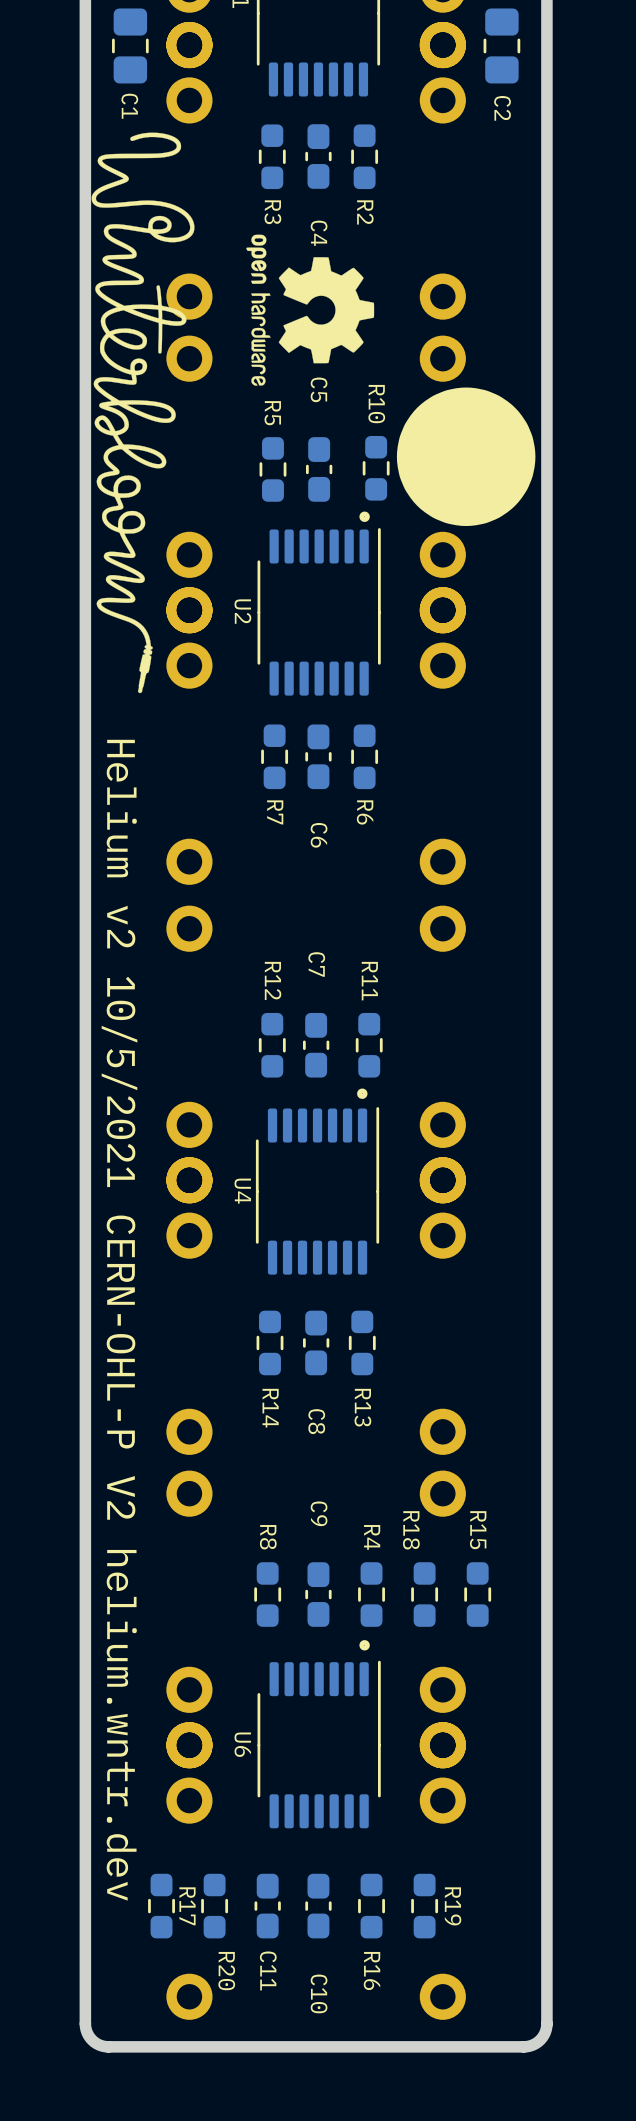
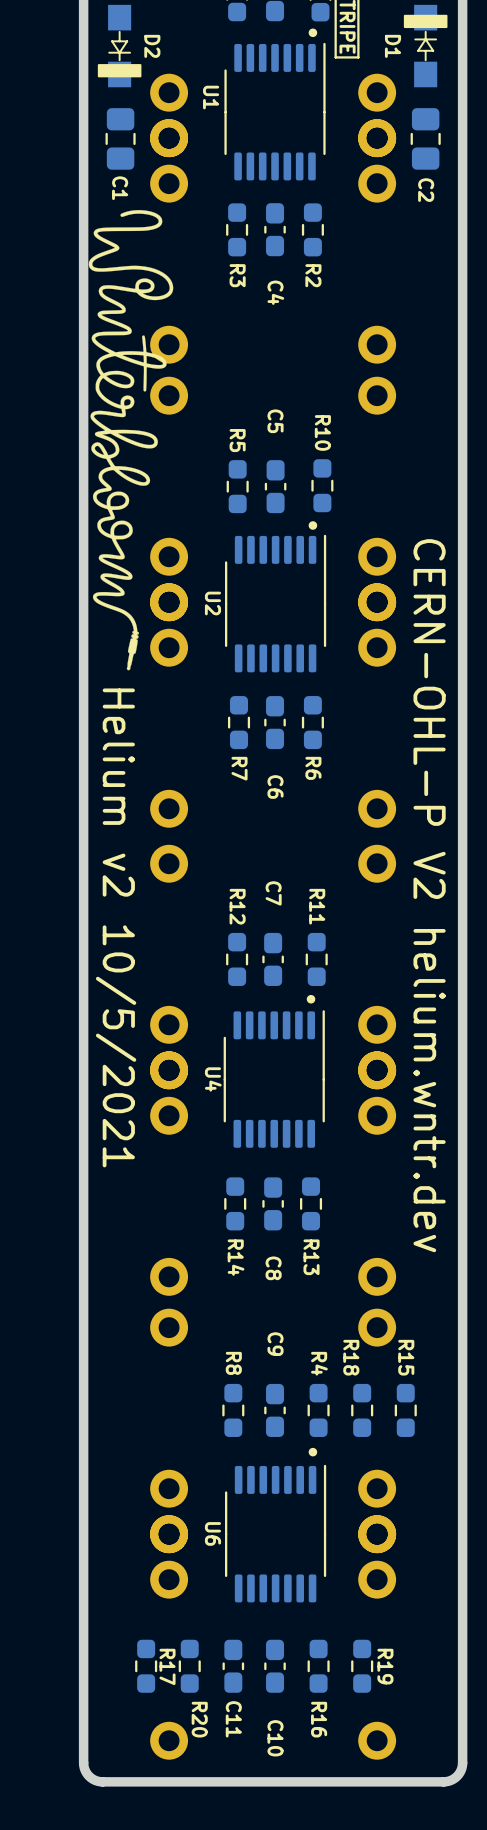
drawing: [246, 234, 536, 527] -> none
text: none -> CERN-OHL-P V2 helium.wntr.dev (429, 895)
text: none -> Helium v2 10/5/2021 (116, 927)
text: Helium v2 10/5/2021 CERN-OHL-P V2 helium.wntr.dev (119, 1320) -> none

